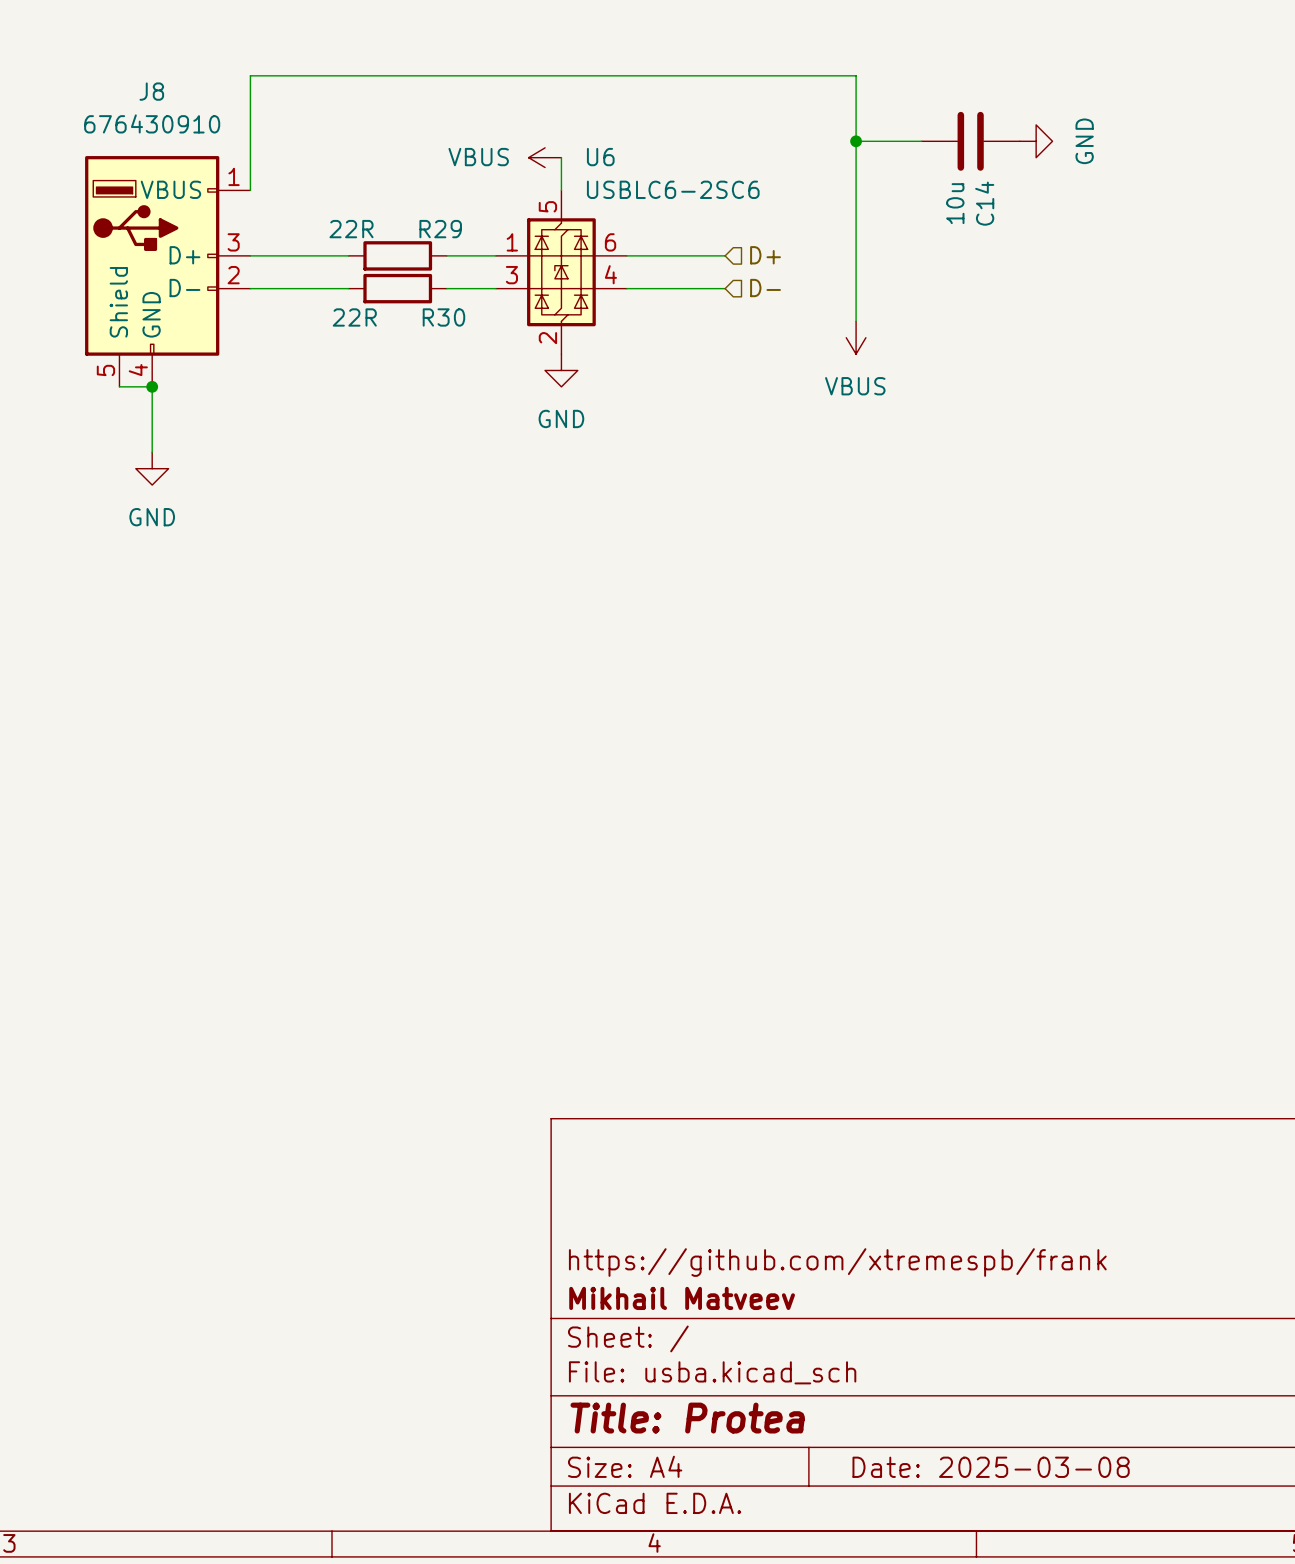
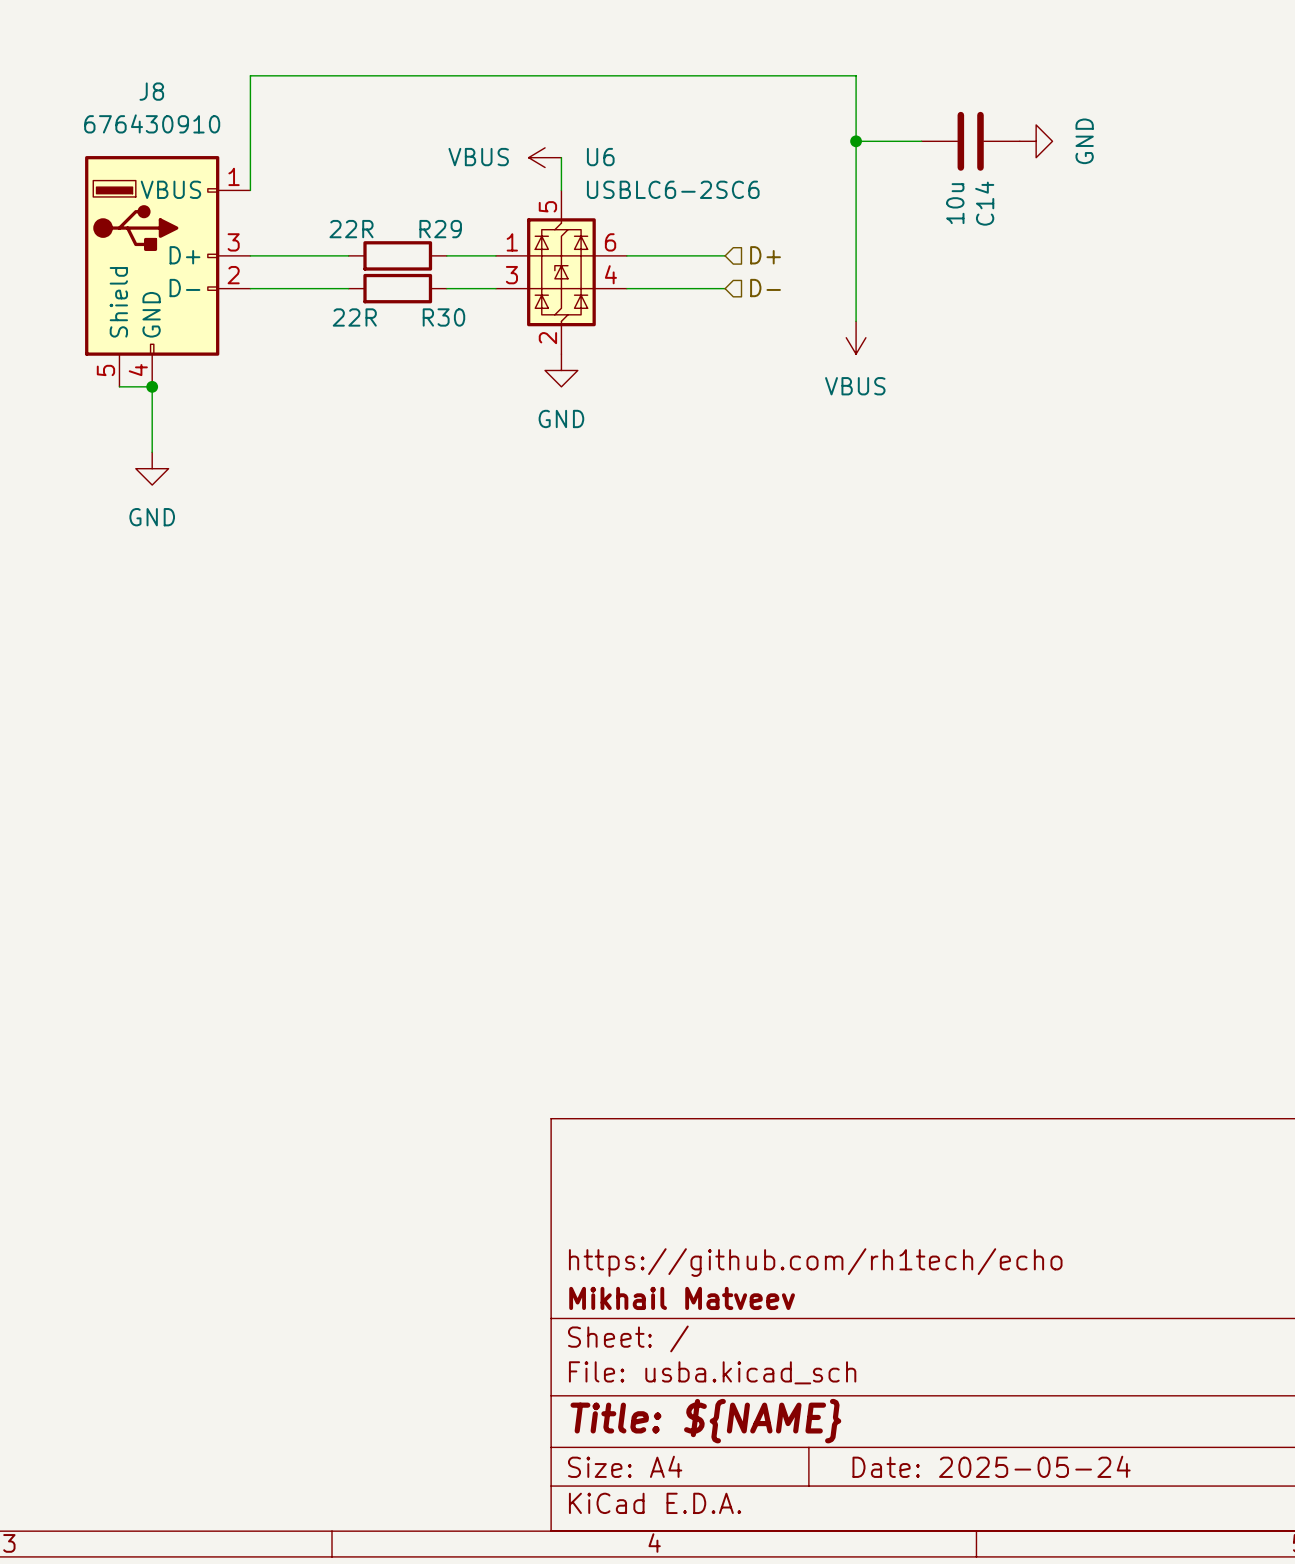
title block: https://github.com/xtremespb/frank (837, 1262) -> https://github.com/rh1tech/echo (815, 1262)
title block: Title: Protea (687, 1418) -> Title: ${NAME} (705, 1421)
title block: Date: 2025-03-08 (991, 1467) -> Date: 2025-05-24 (991, 1466)

